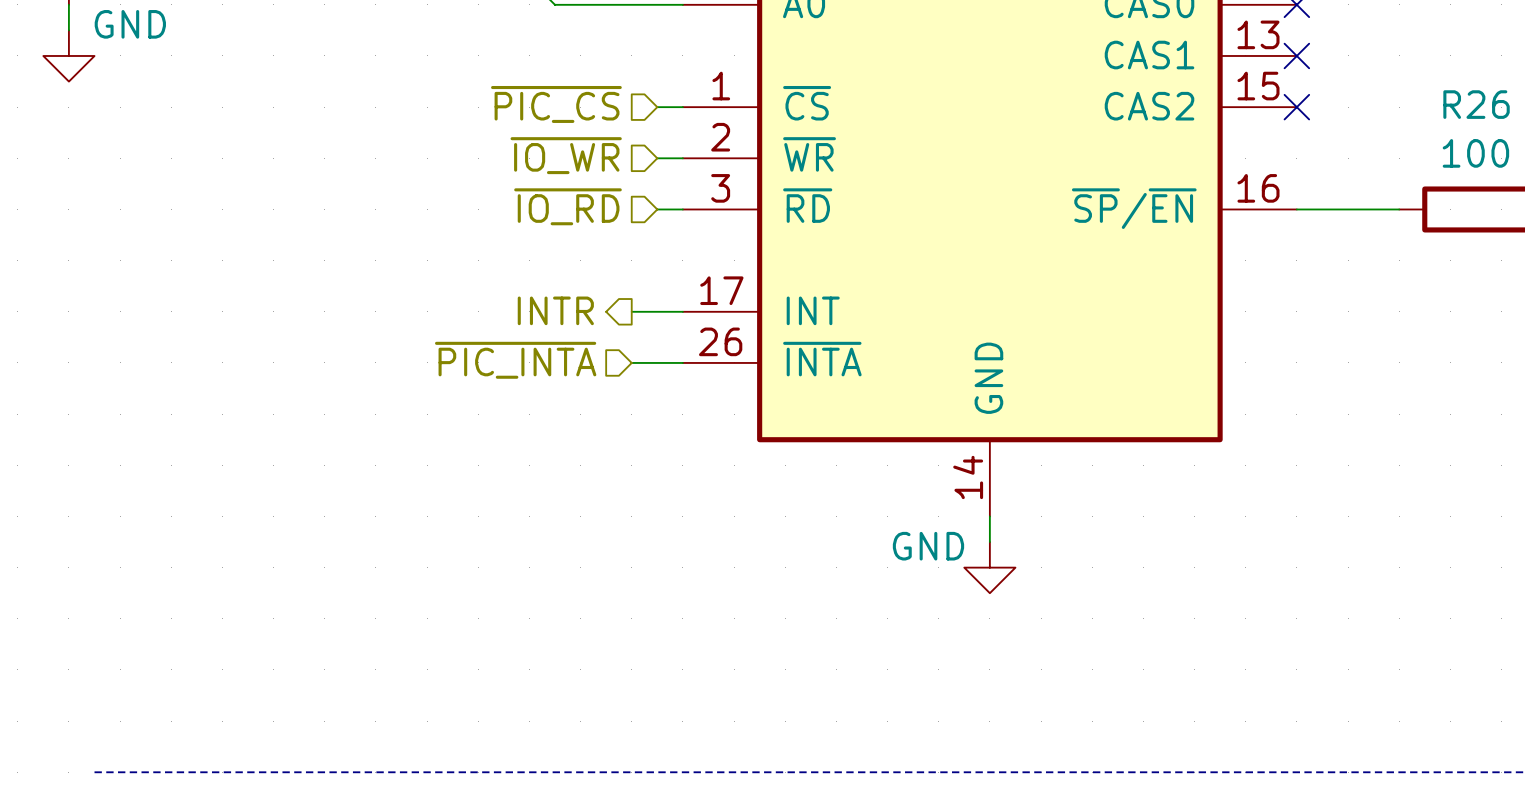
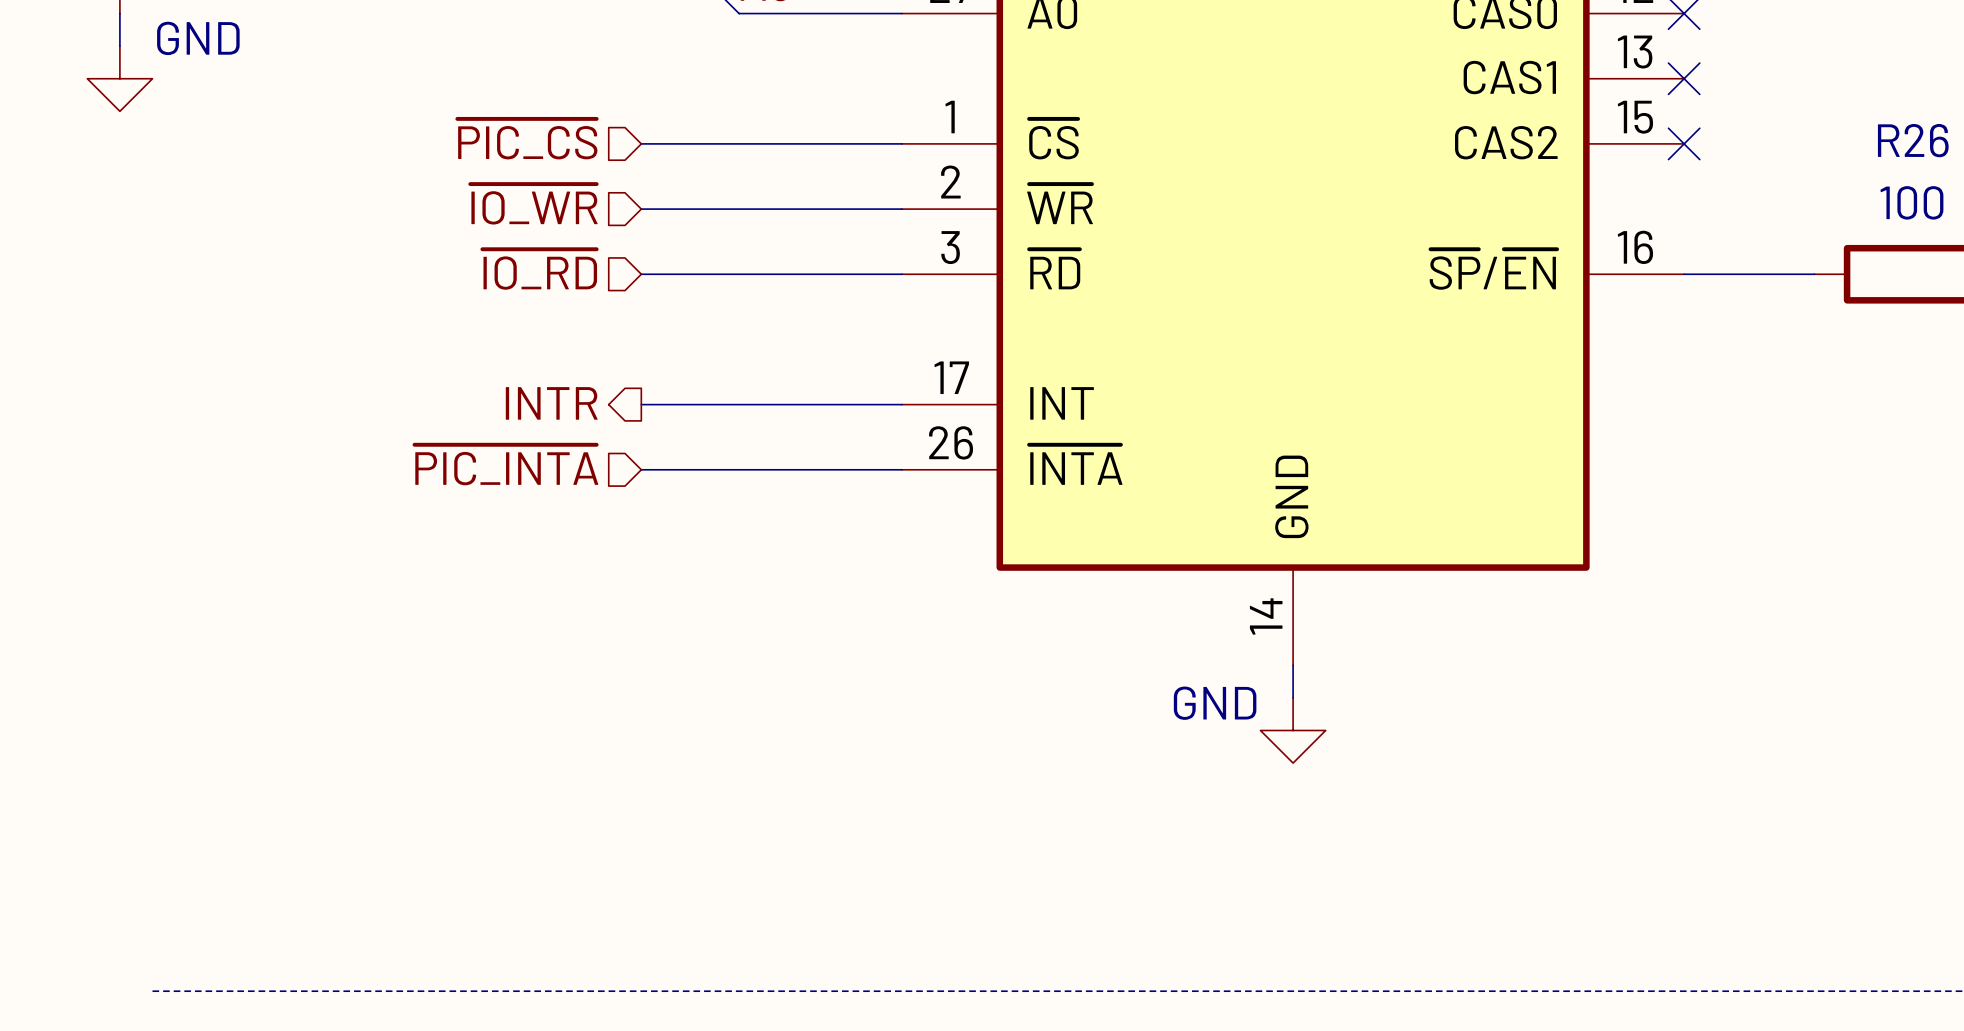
hierarchical label position: ~{PIC_CS} (556, 104) -> ~{PIC_CS} (527, 139)
wire: none -> (641, 143) (869, 143)
hierarchical label position: ~{IO_WR} (566, 155) -> ~{IO_WR} (533, 204)
wire: none -> (641, 209) (869, 209)
hierarchical label position: ~{IO_RD} (567, 206) -> ~{IO_RD} (539, 269)
wire: none -> (641, 274) (869, 274)
hierarchical label position: INTR (555, 310) -> INTR (551, 403)
wire: none -> (641, 404) (836, 404)
hierarchical label position: ~{PIC_INTA} (515, 360) -> ~{PIC_INTA} (506, 465)
wire: none -> (641, 469) (836, 469)

